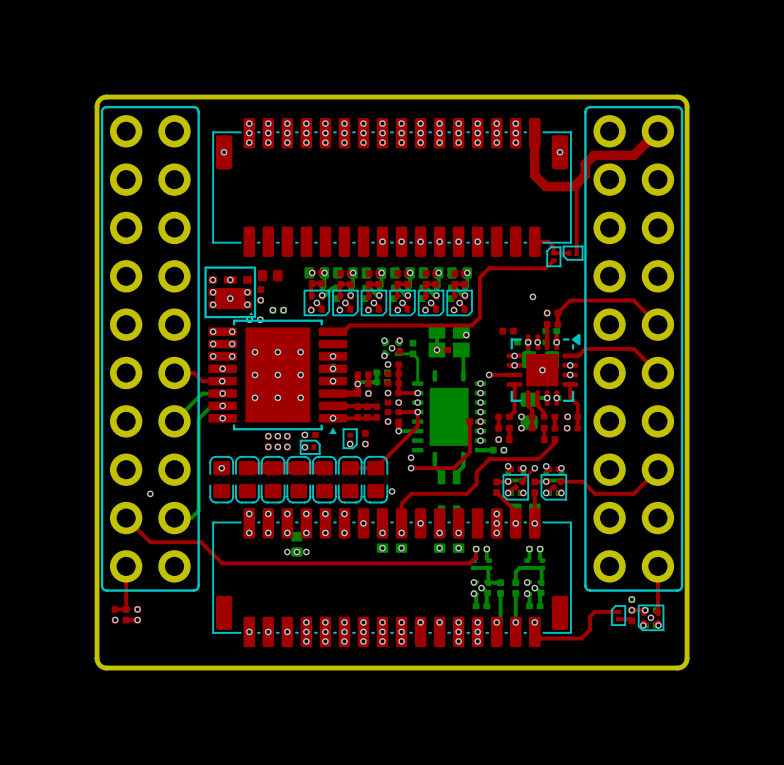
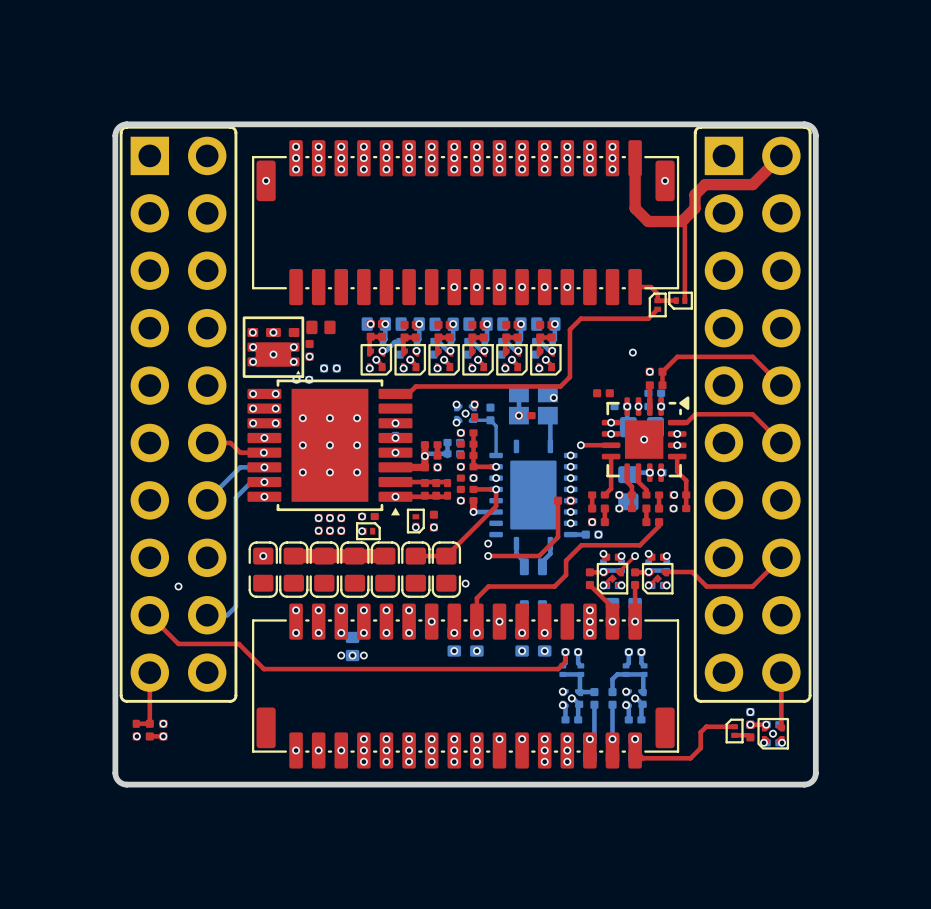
board edge: none -> (126, 124) (804, 124) (812, 127) (815, 135) (815, 773) (812, 781) (804, 784) (126, 784) (118, 781) (115, 773) (115, 135) (118, 127) (126, 124)
part: none -> (178, 414)
part: none -> (752, 414)
part: (392, 382) -> none

